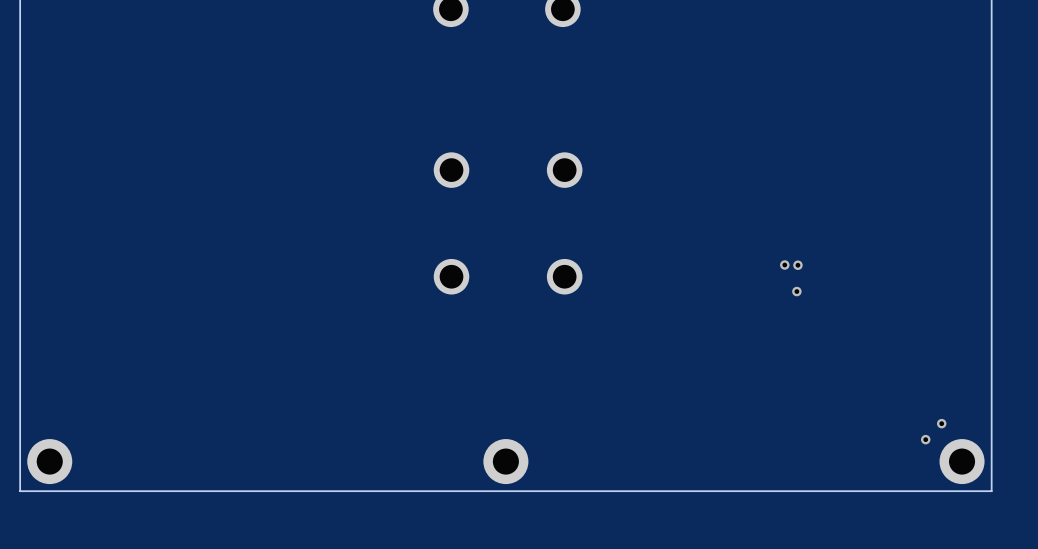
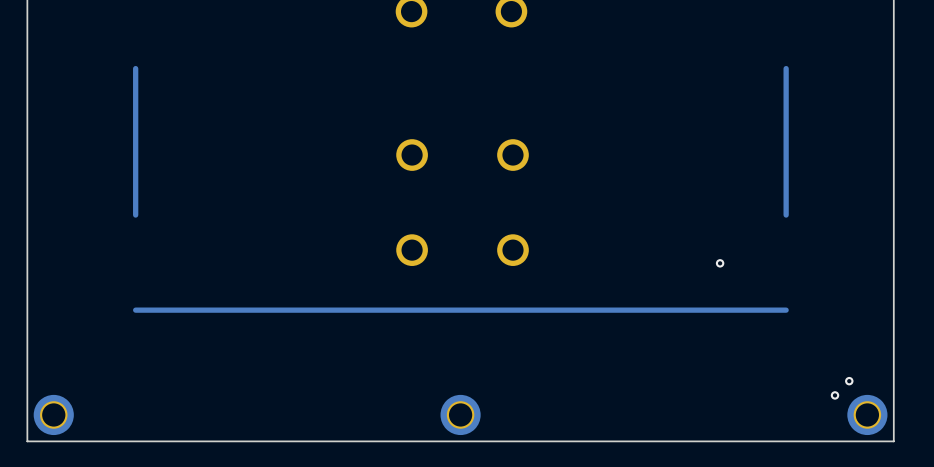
track: none -> (135, 68) (135, 215)
track: none -> (786, 68) (786, 215)
via: (784, 265) -> none
via: (797, 265) -> none
track: none -> (786, 310) (135, 310)

